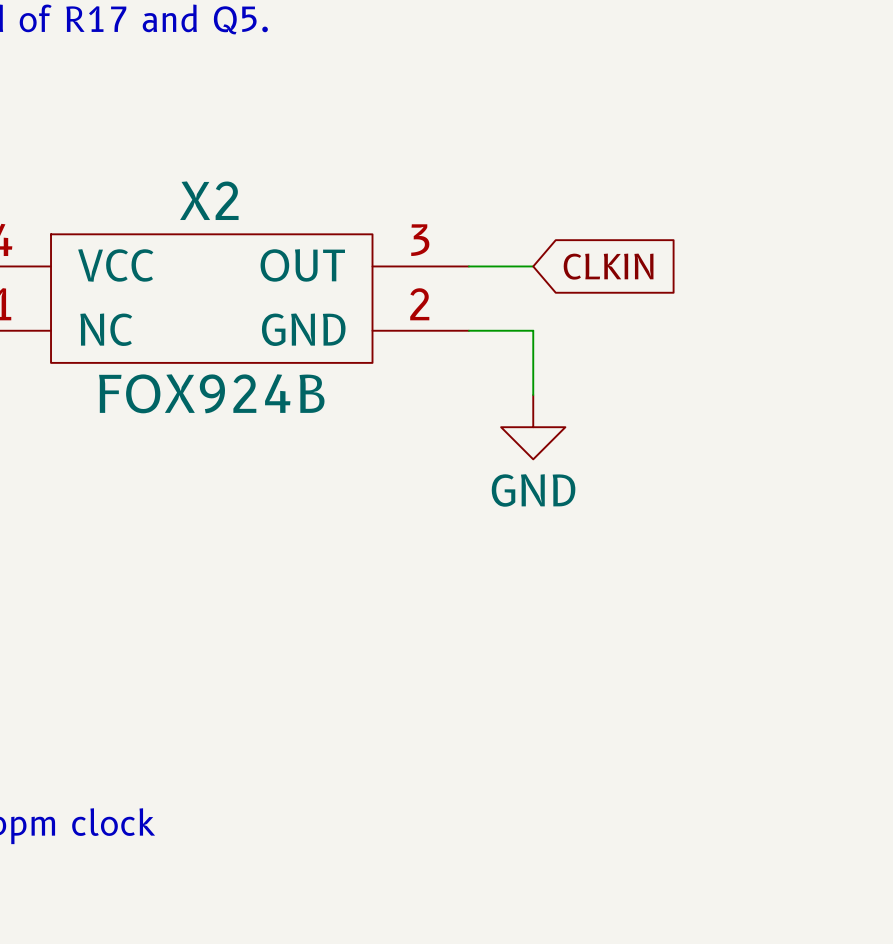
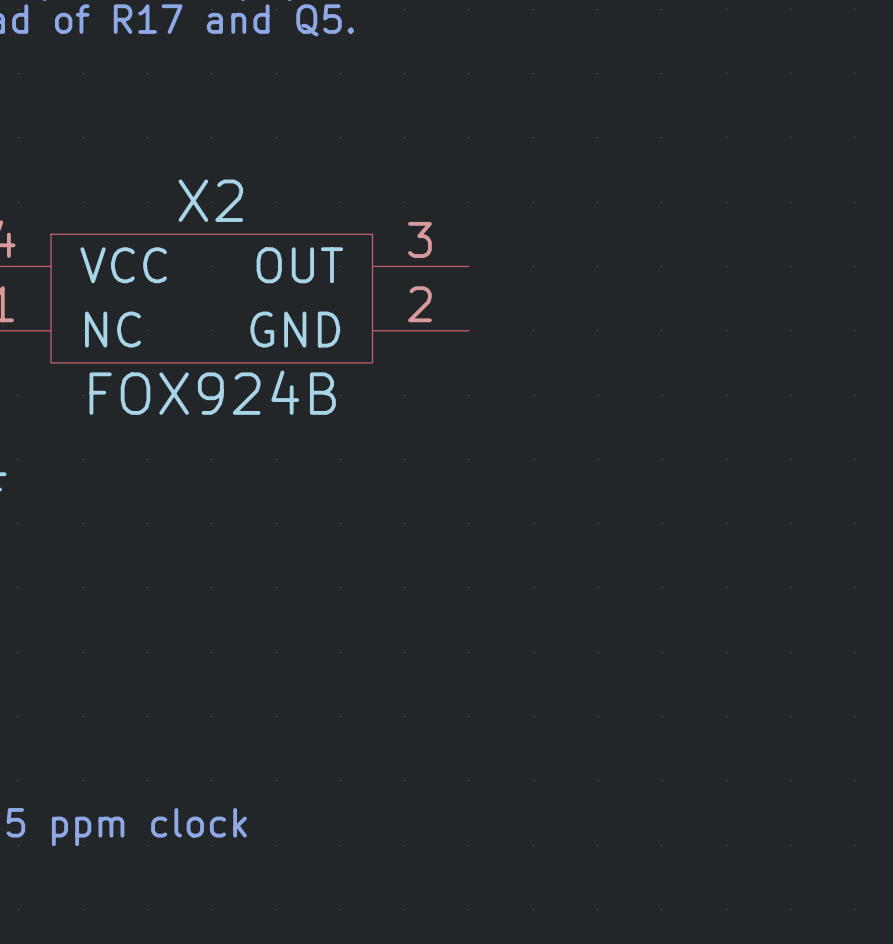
wire: (468, 266) (533, 266) -> none
global label: CLKIN (608, 266) -> none
wire: (468, 330) (533, 330) (533, 395) -> none
power symbol: GND (533, 427) -> none

